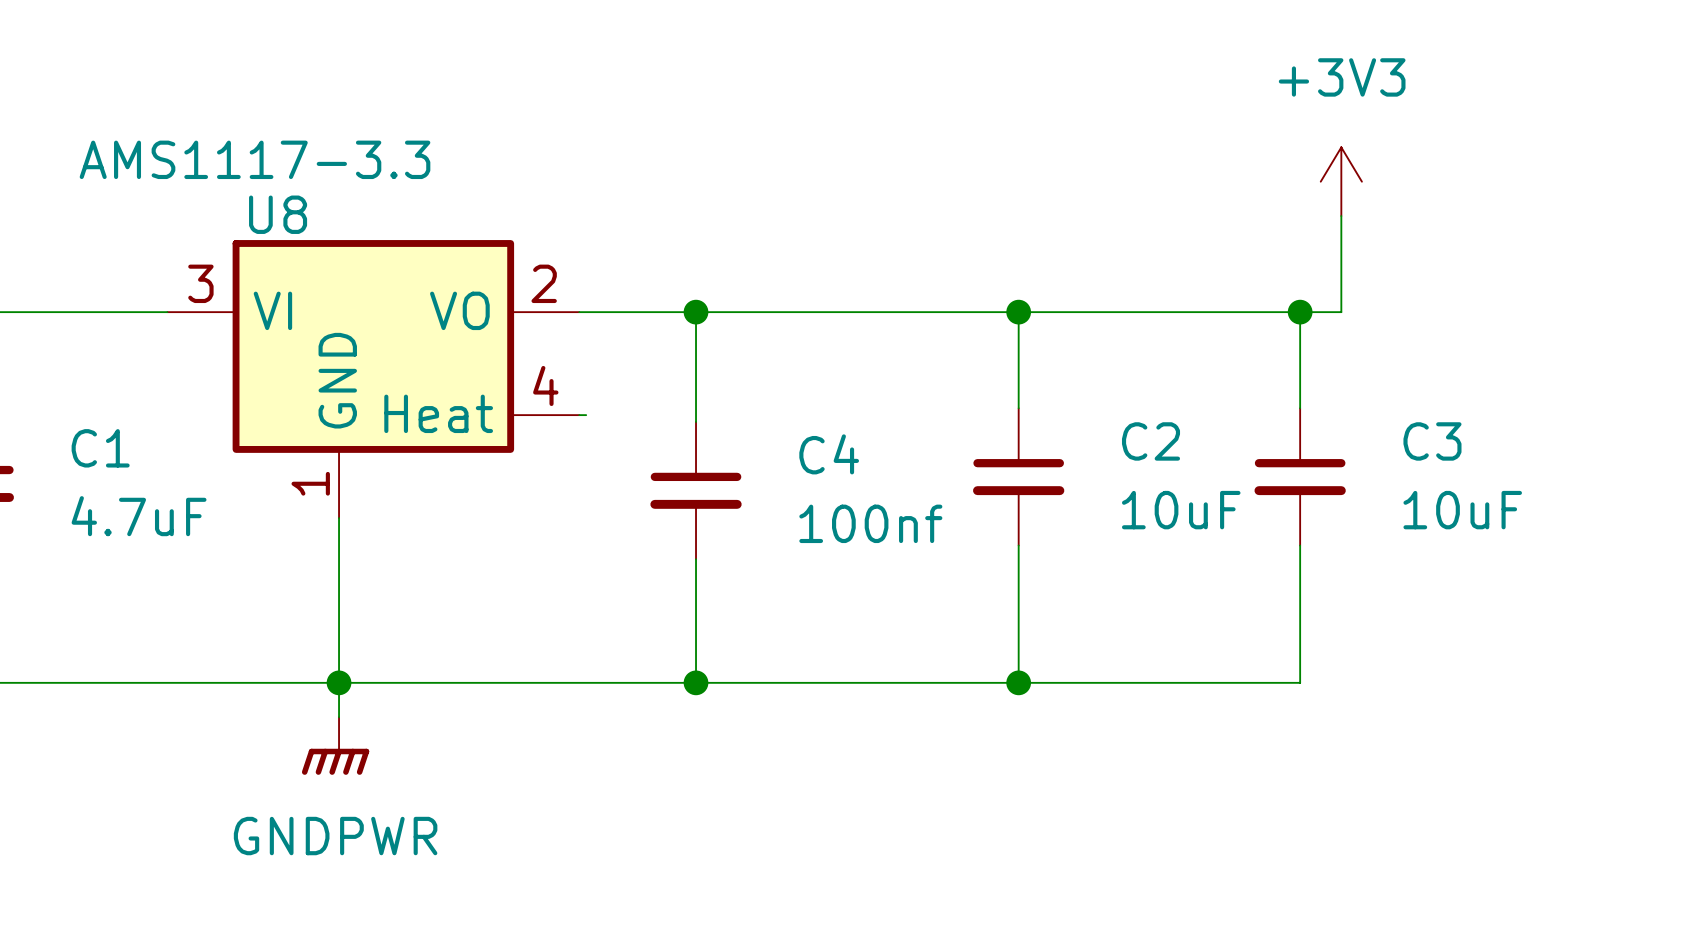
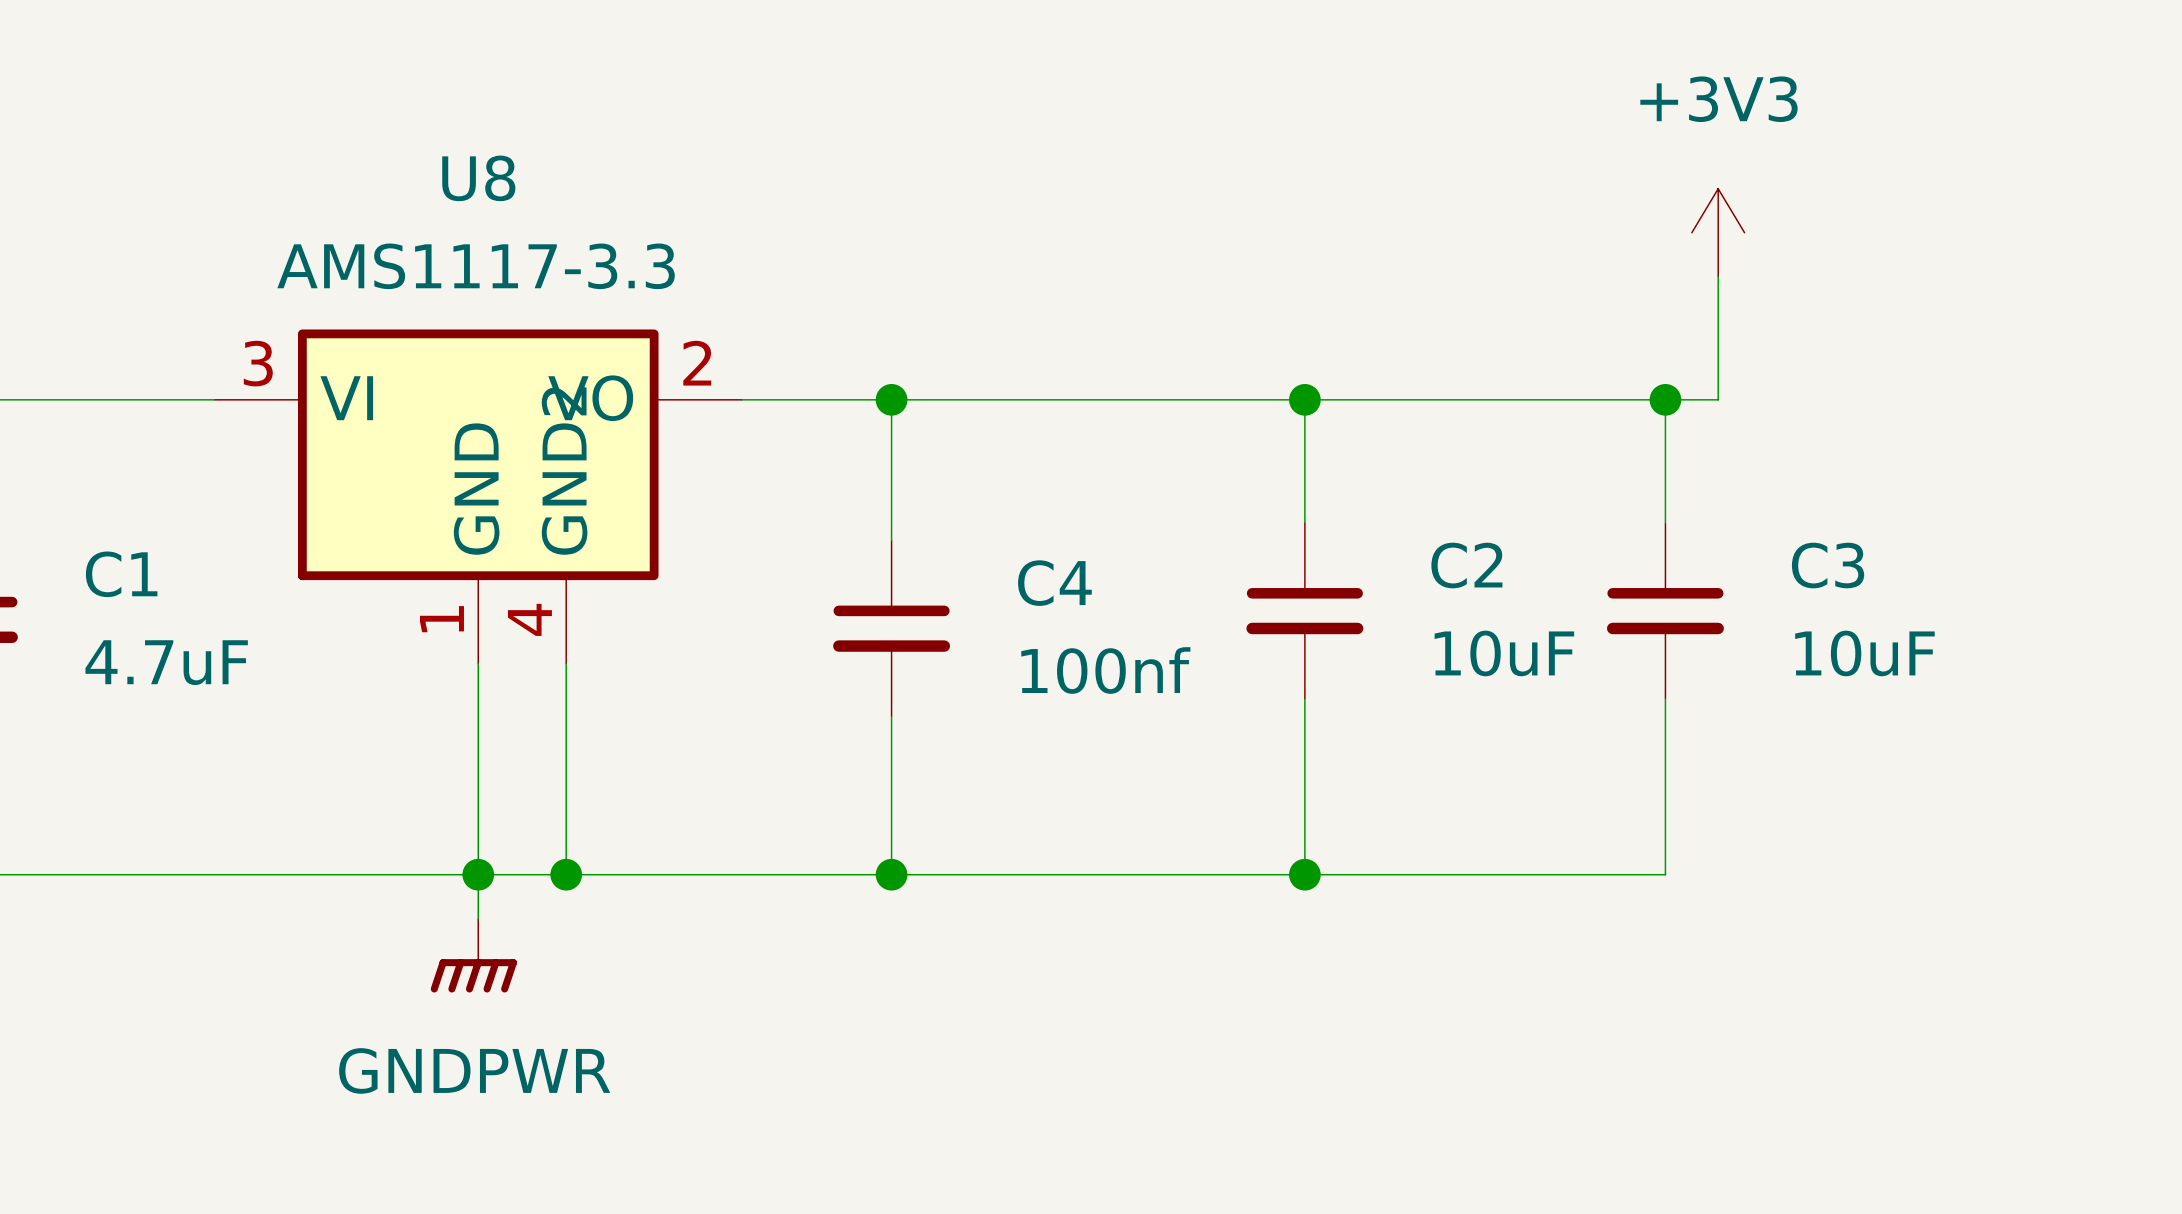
U8 value position: AMS1117-3.3 (255, 159) -> AMS1117-3.3 (476, 266)
U8 name position: U8 (278, 214) -> U8 (478, 178)
U8 symbol: [167, 240, 580, 519] -> [214, 329, 743, 664]
wire: (579, 415) (586, 415) -> none
wire: (339, 518) (339, 717) -> (478, 663) (478, 918)
wire: none -> (566, 663) (566, 874)
junction position: (339, 682) -> (478, 874)
junction: none -> (566, 874)
power symbol position: GNDPWR (335, 746) -> GNDPWR (473, 955)

